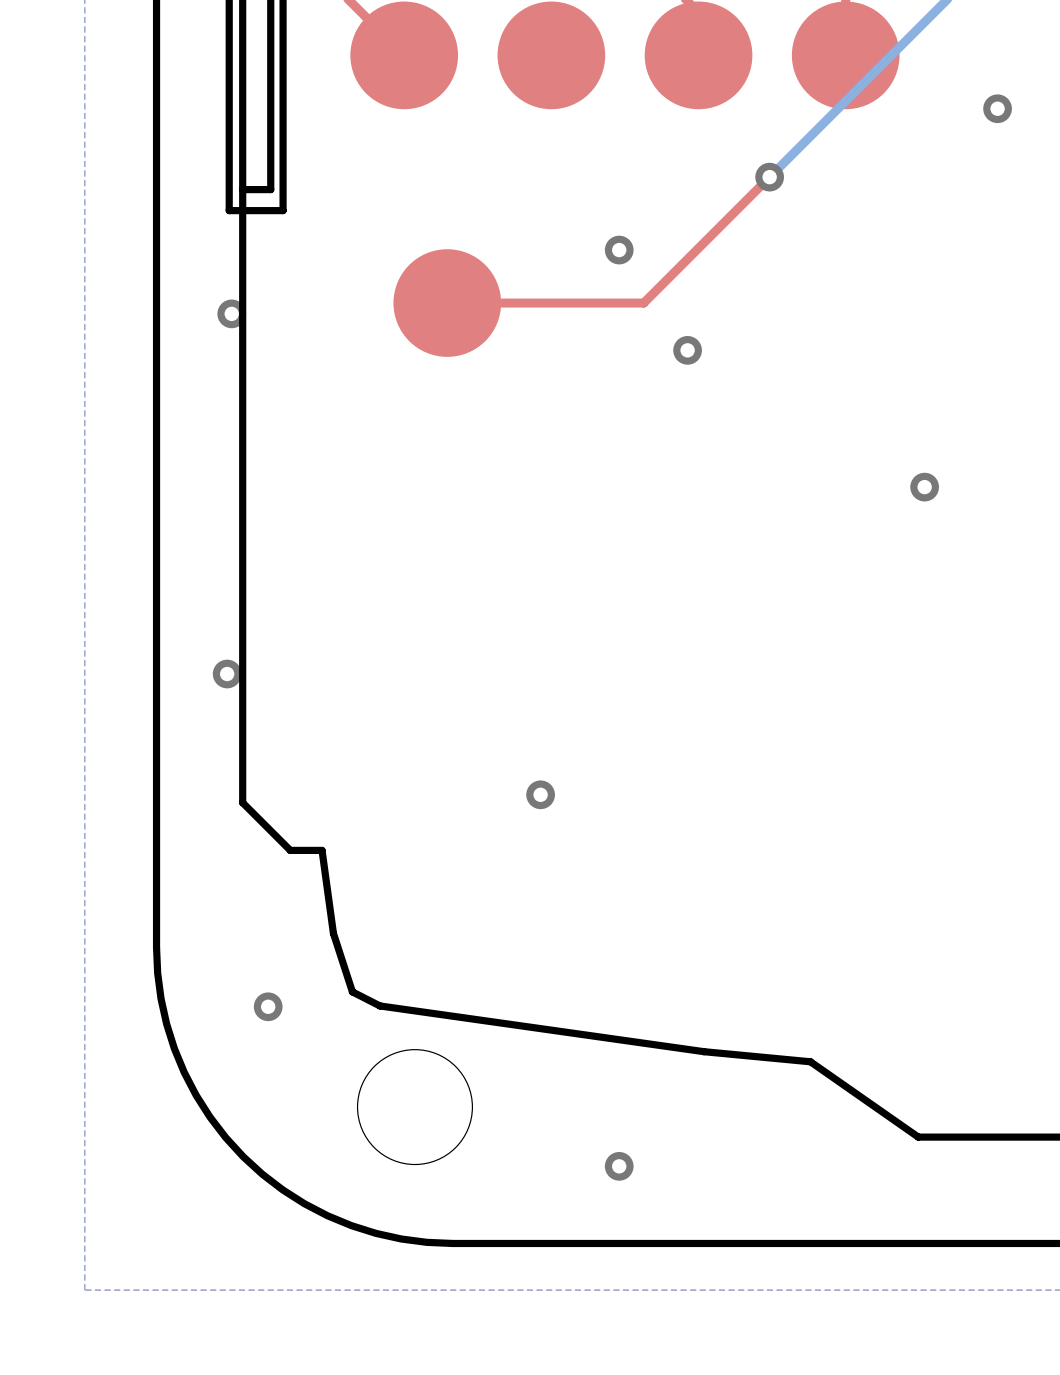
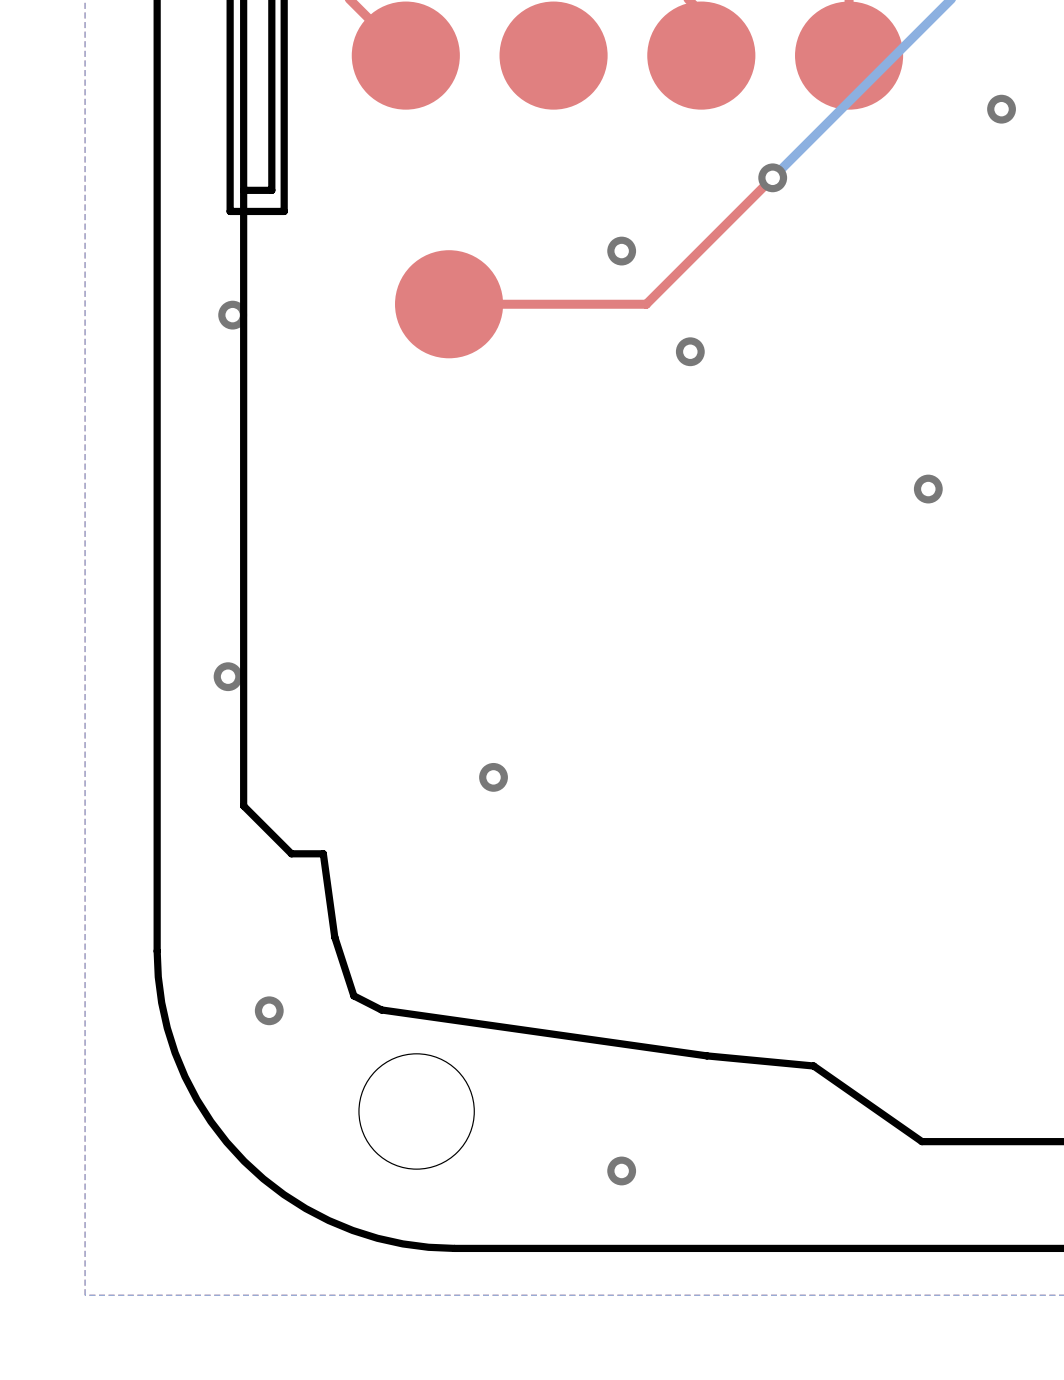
via position: (540, 794) -> (493, 777)

